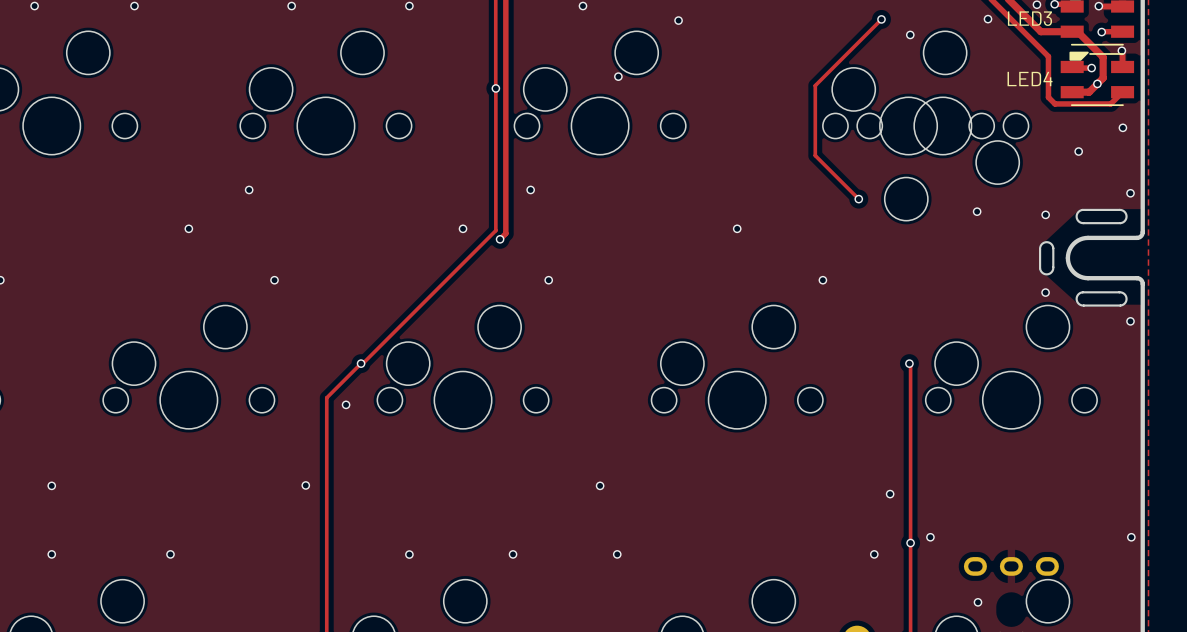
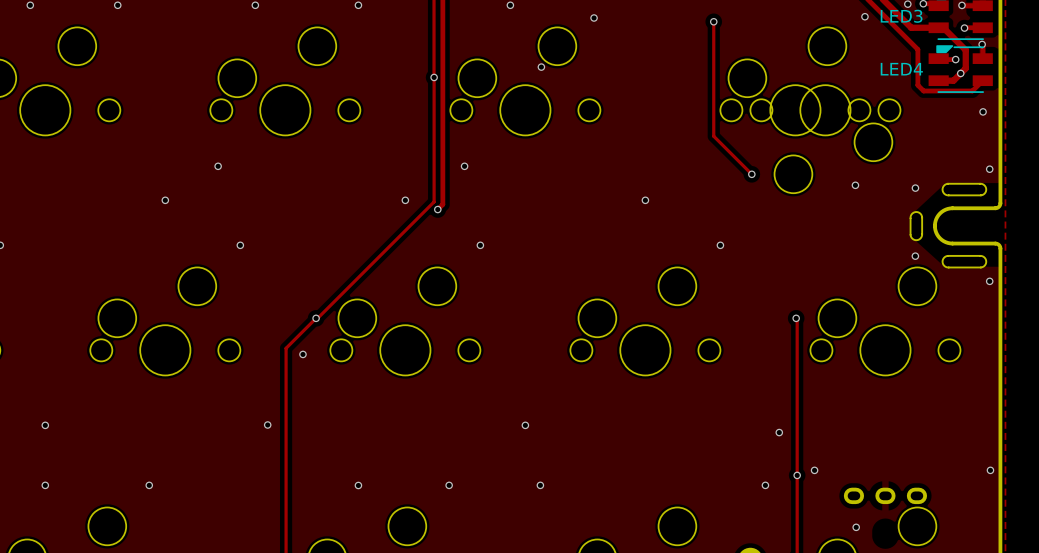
track: (881, 19) (815, 85) -> (713, 21) (713, 74)
via: (881, 19) -> none
via: none -> (713, 21)
via: (910, 34) -> none
via: (1078, 151) -> none

